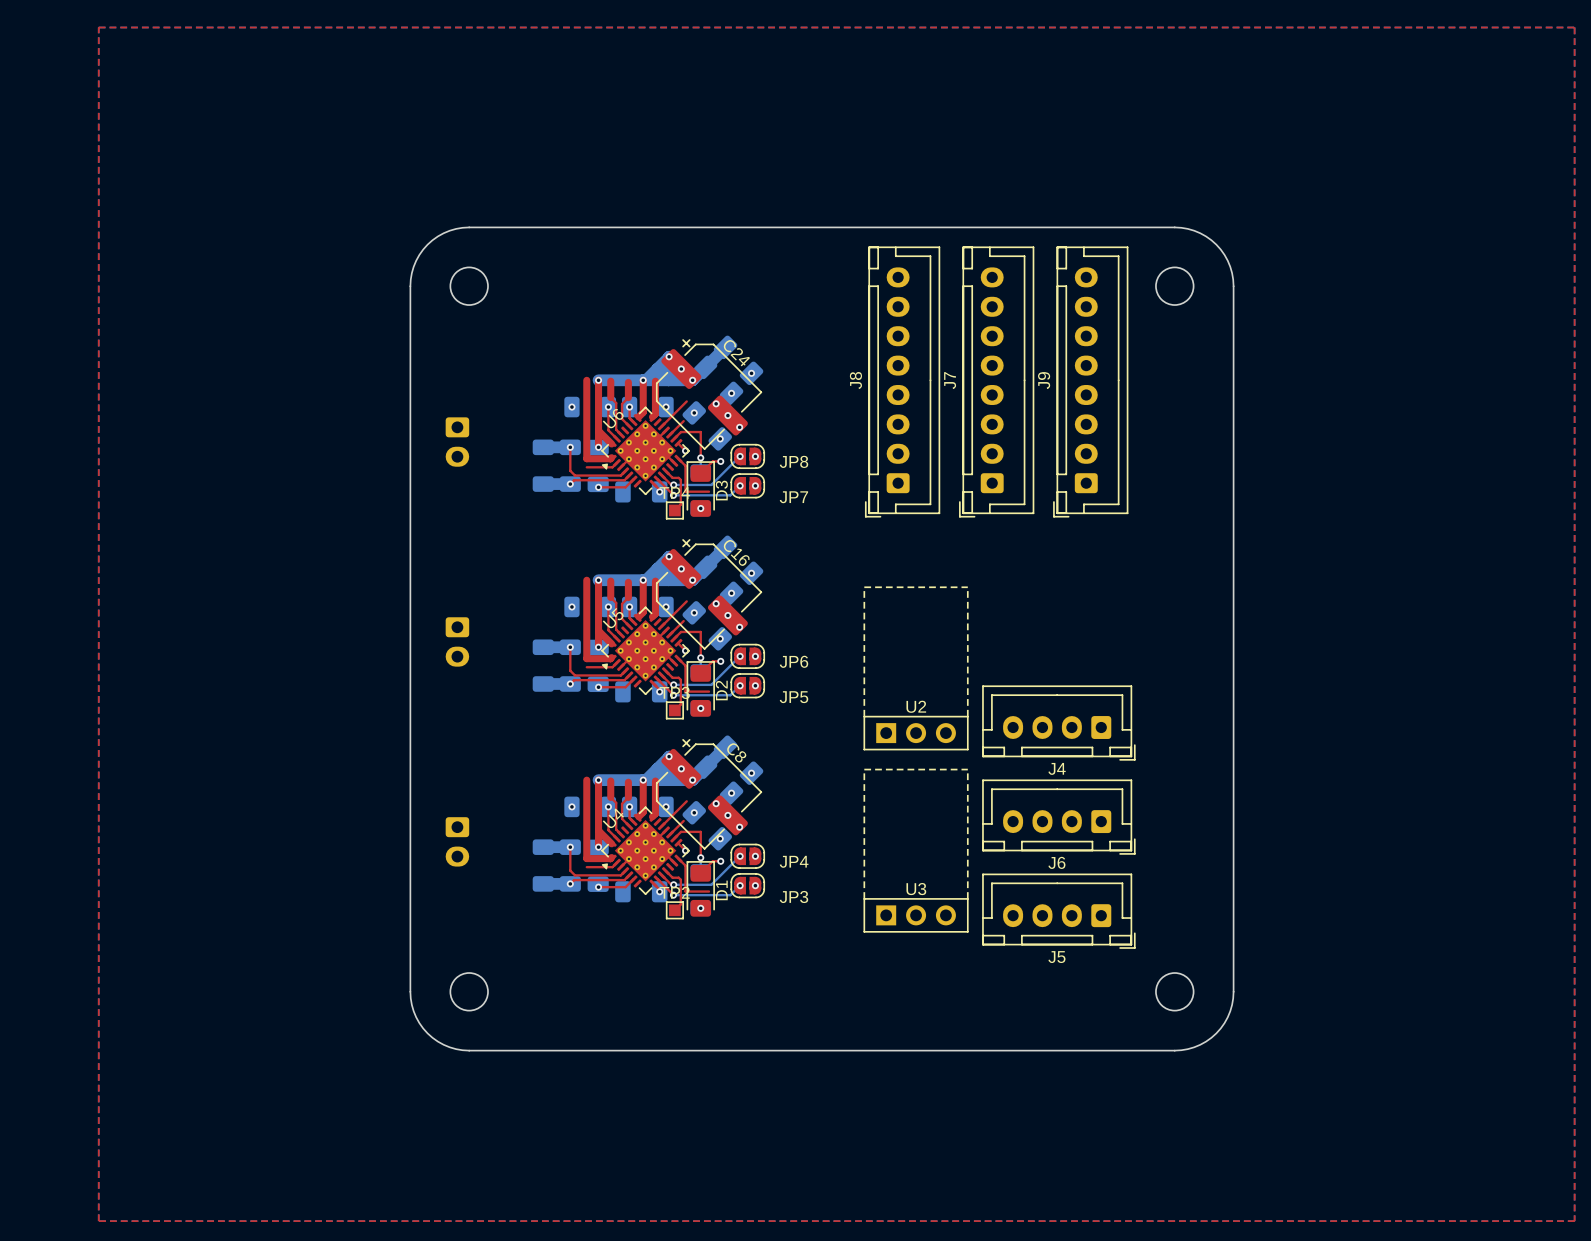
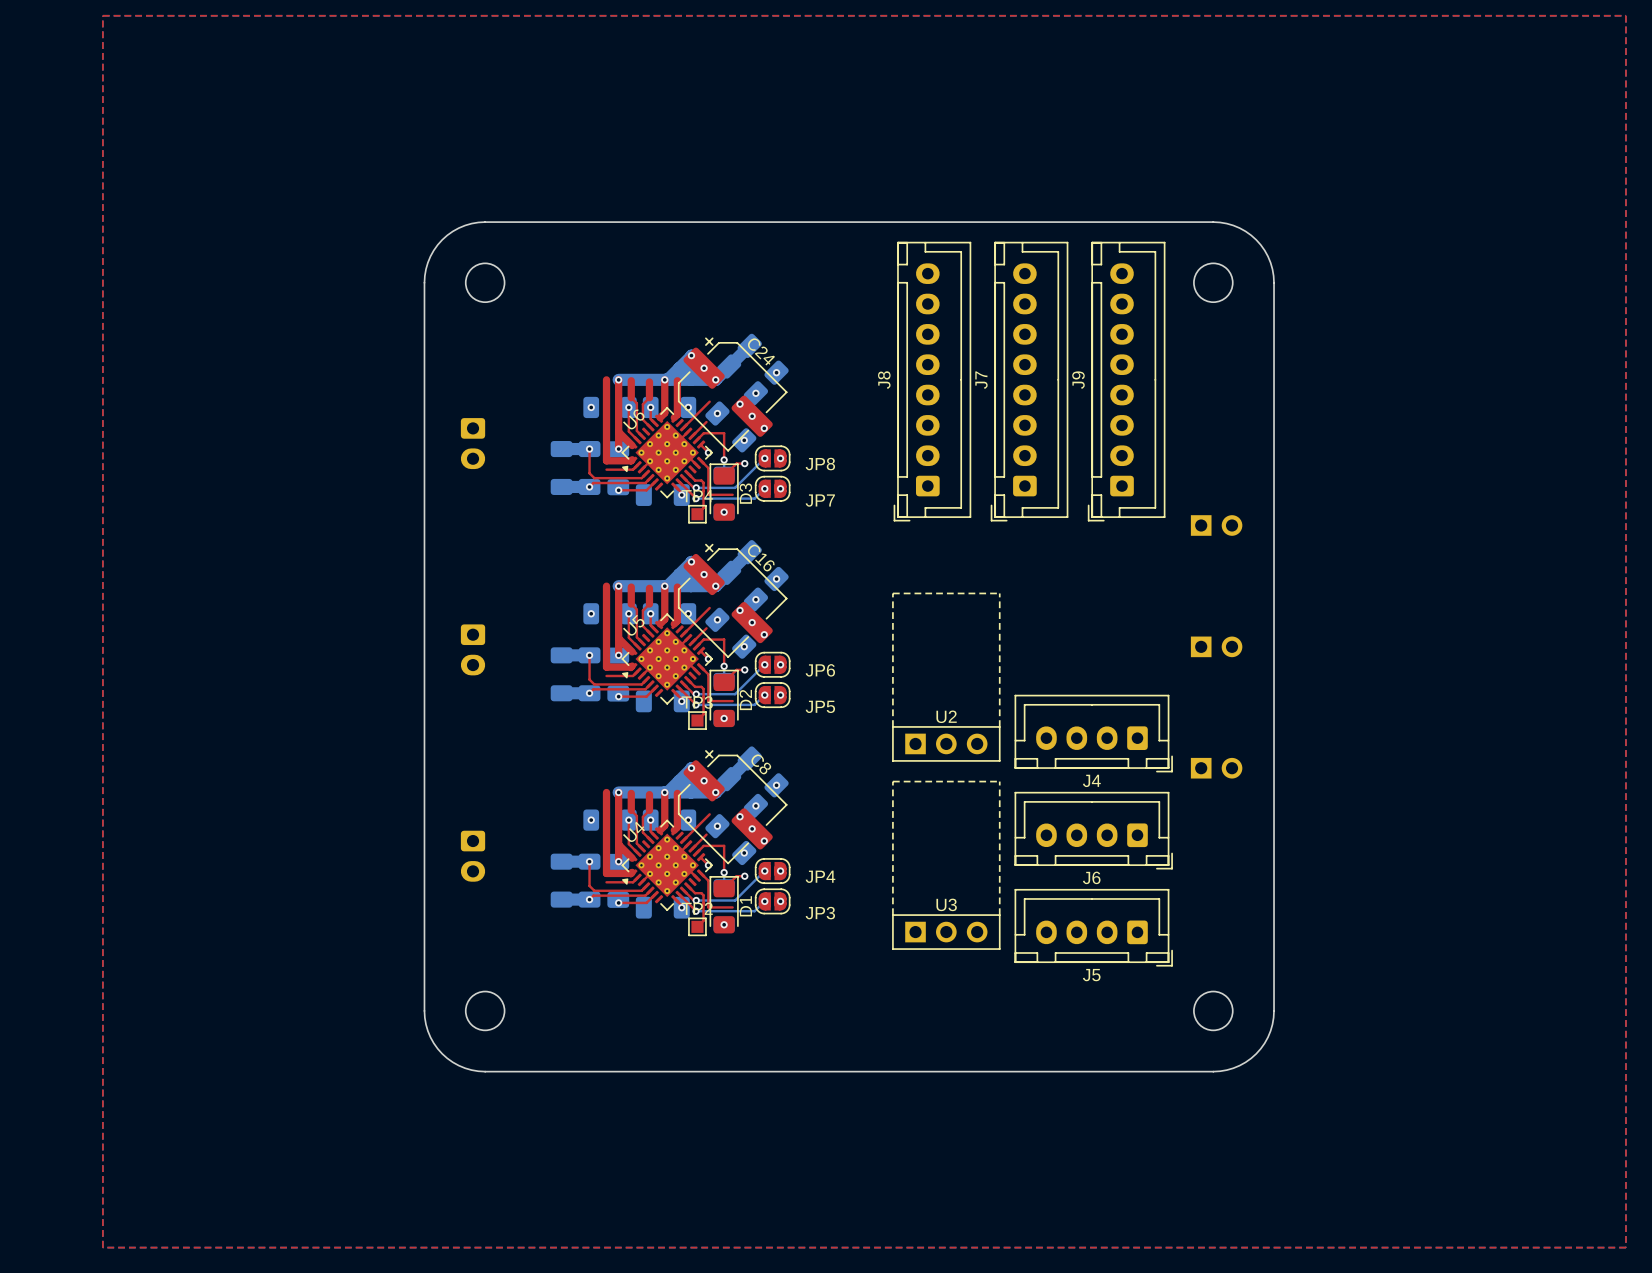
part: none -> (1216, 525)
part: none -> (1216, 646)
part: none -> (1216, 768)

